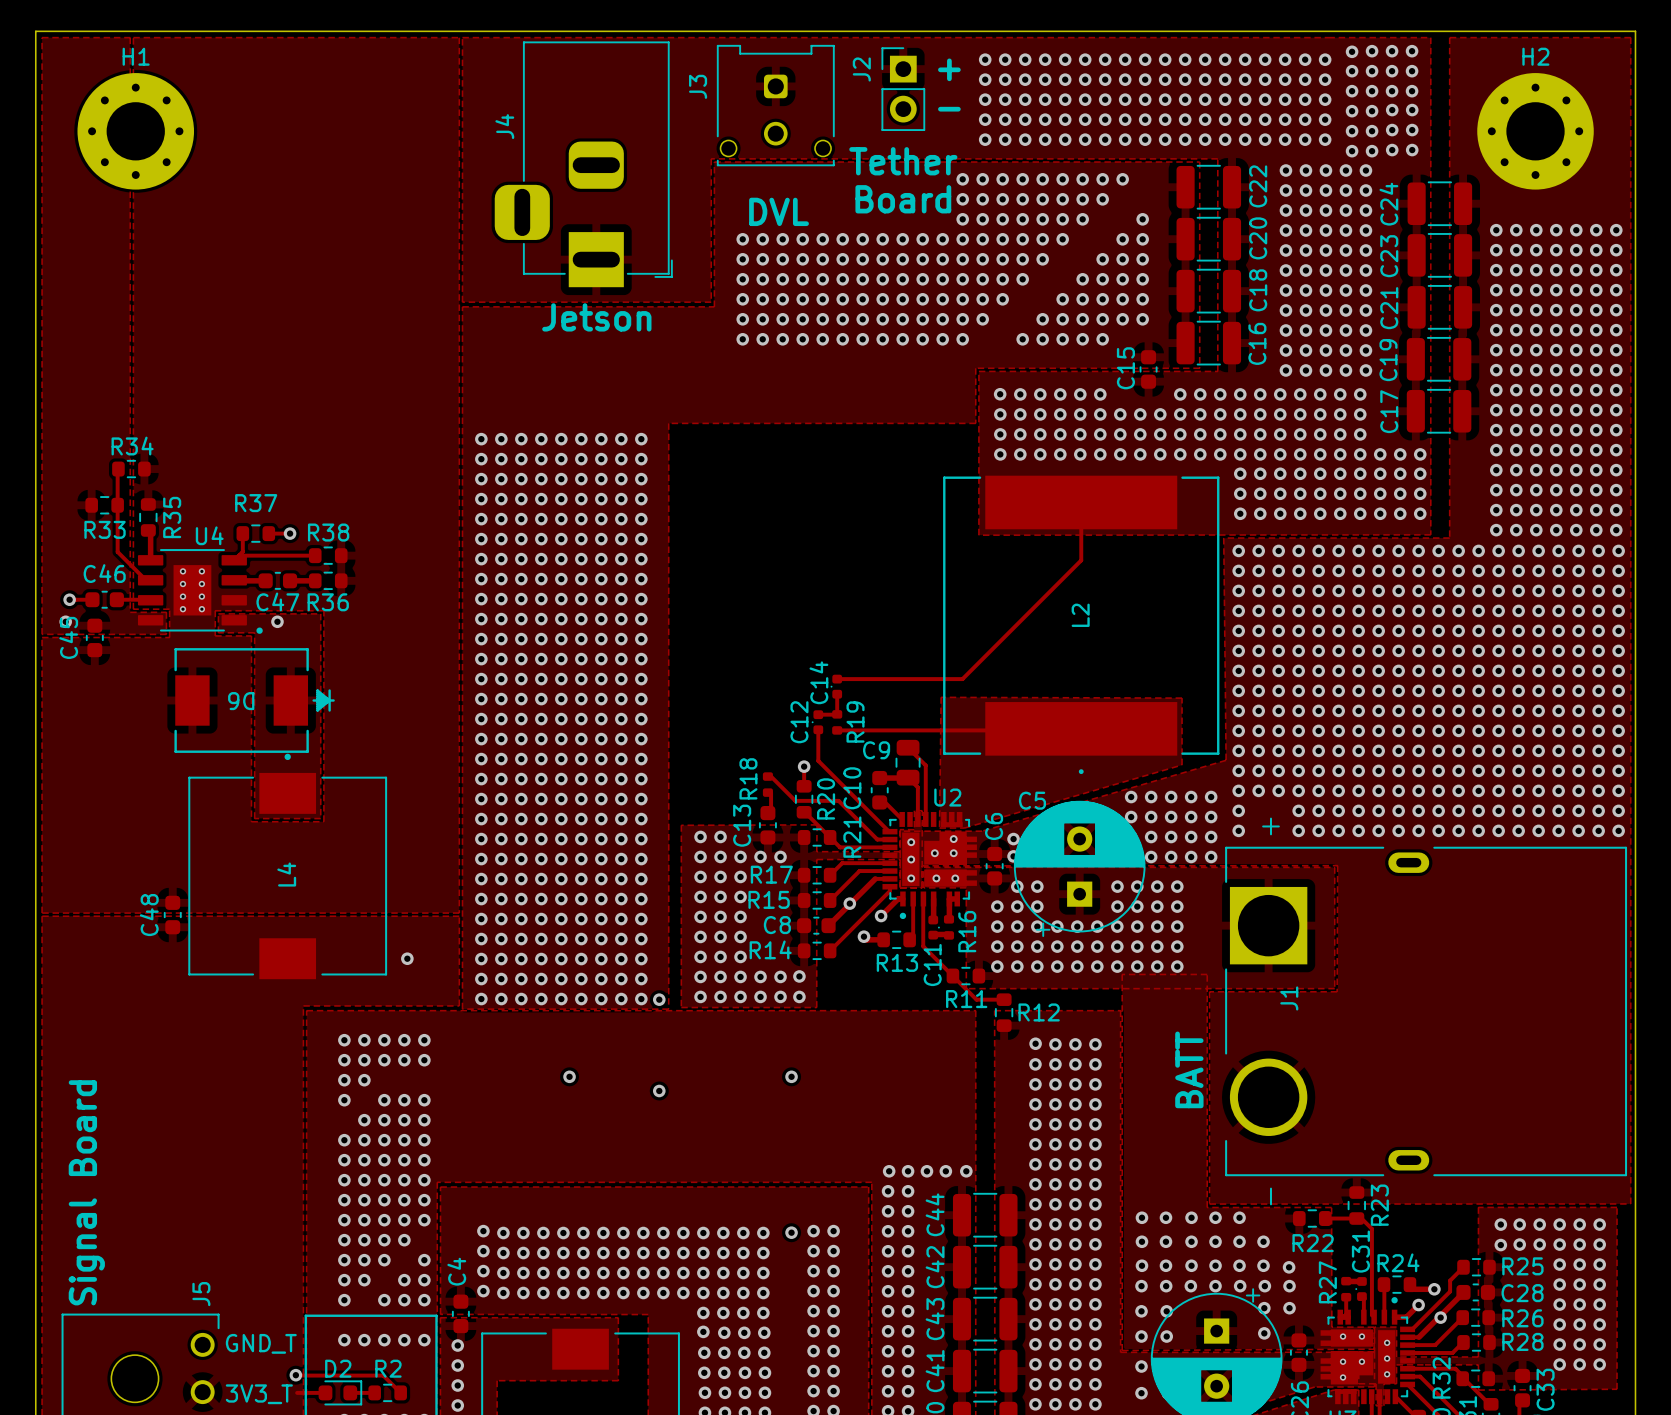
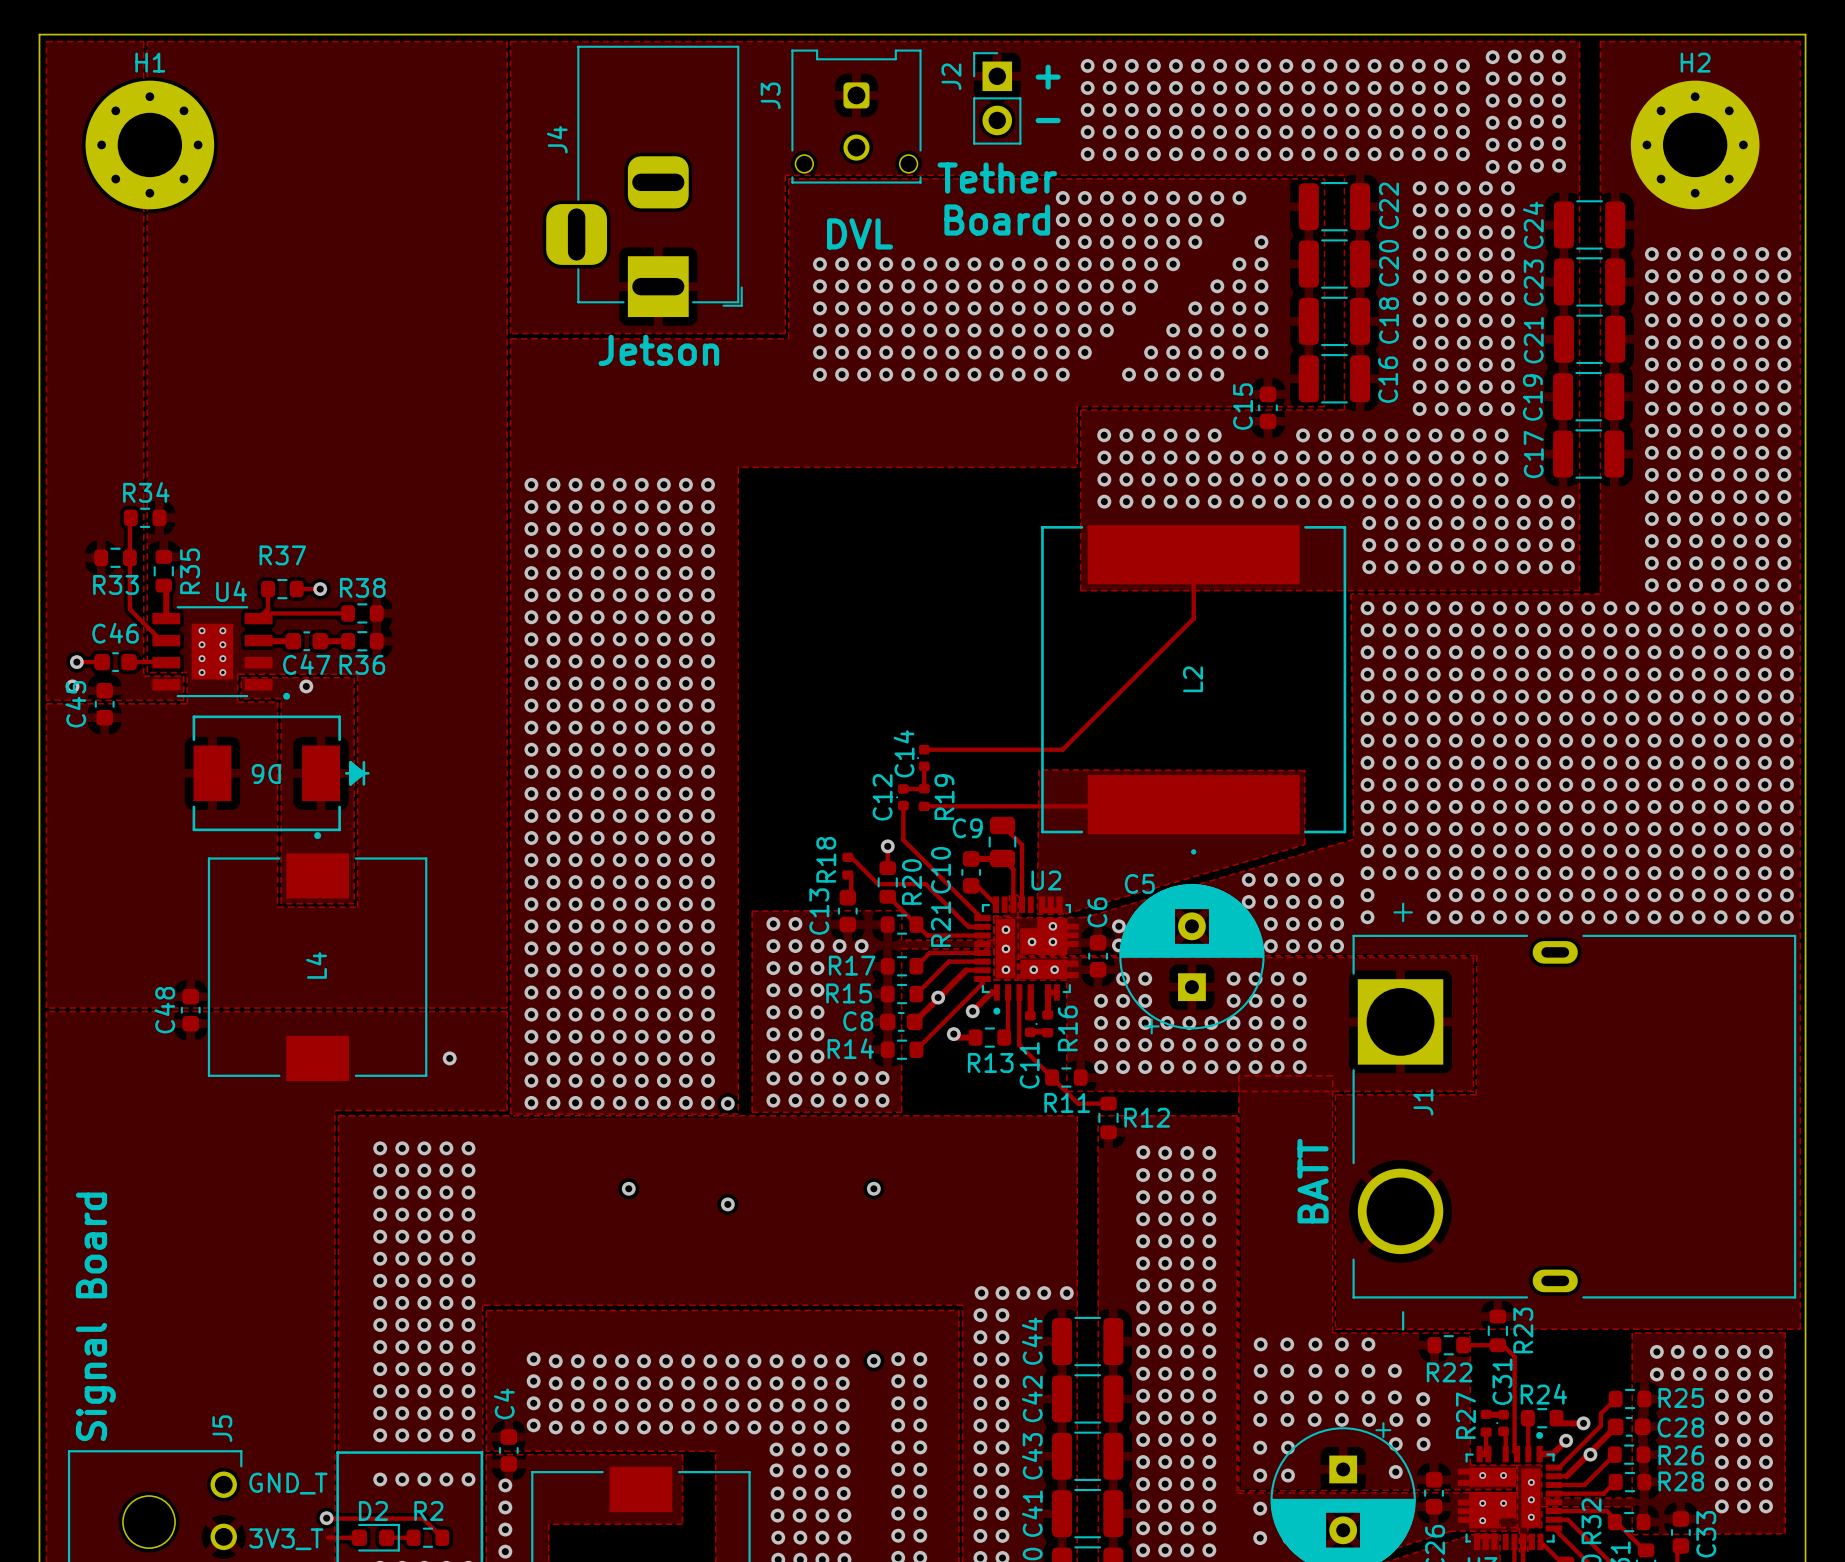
via: none -> (424, 1192)
via: none -> (446, 1192)
via: none -> (468, 1192)
via: none -> (402, 1214)
via: none -> (380, 1236)
via: none -> (468, 1369)
via: none -> (446, 1391)
via: none -> (424, 1413)
via: none -> (402, 1435)

